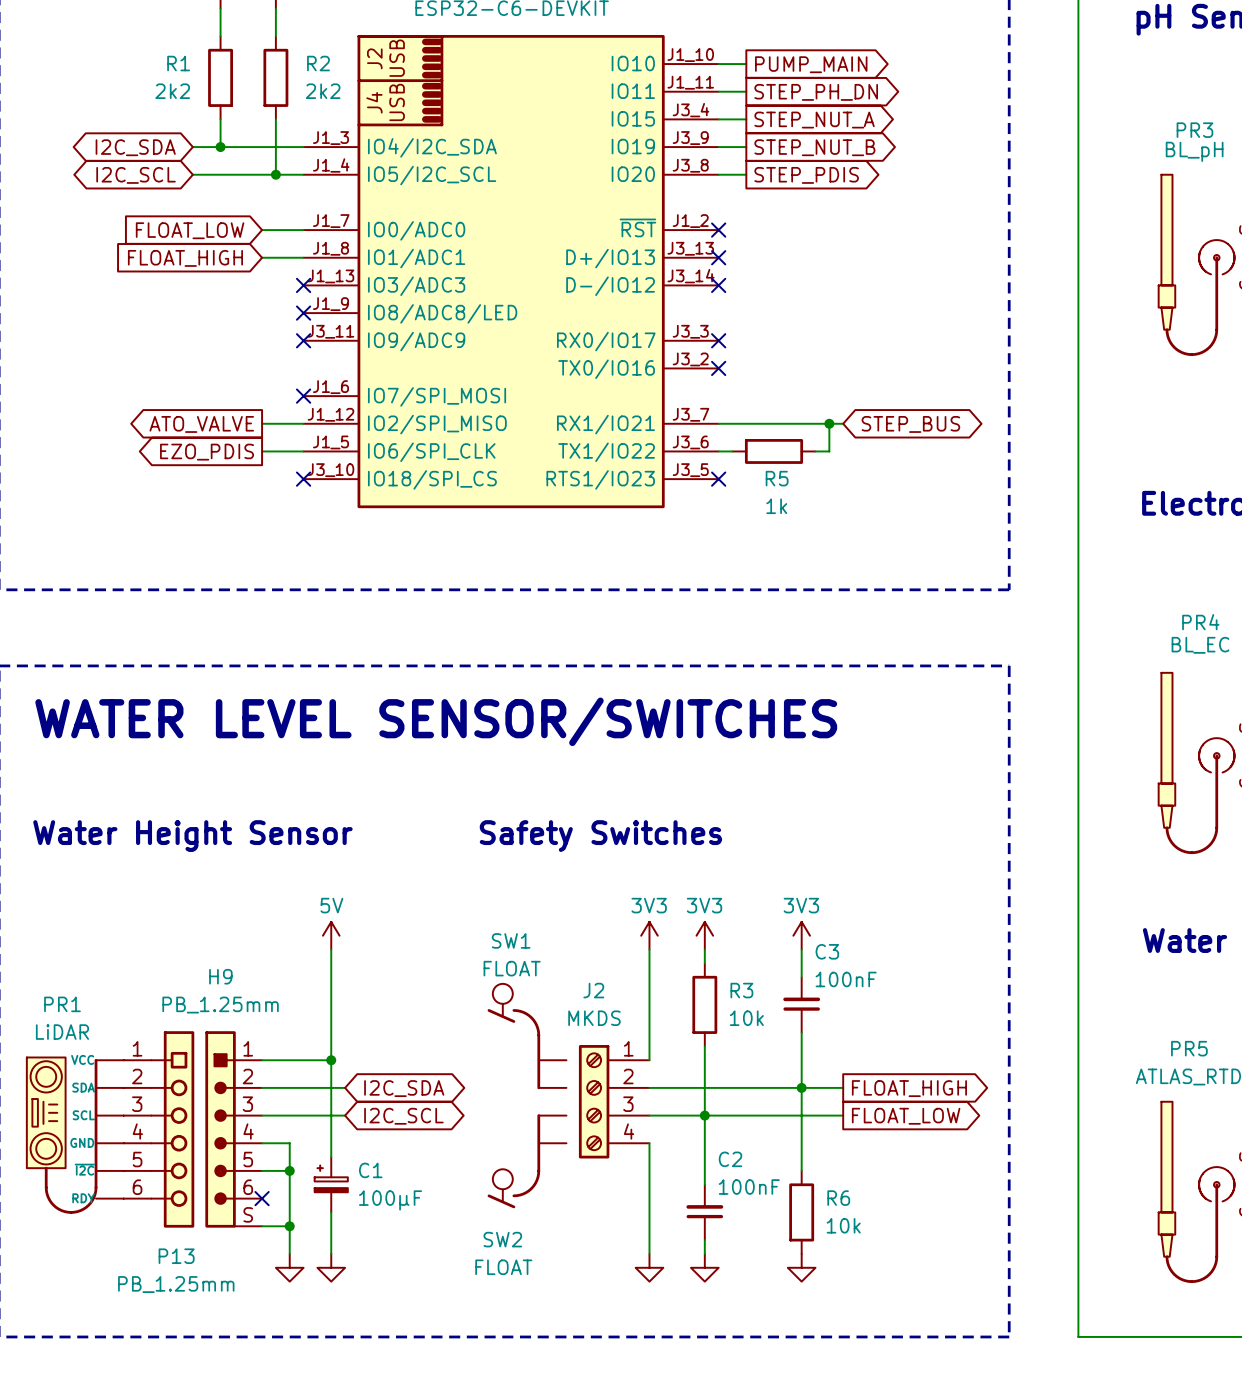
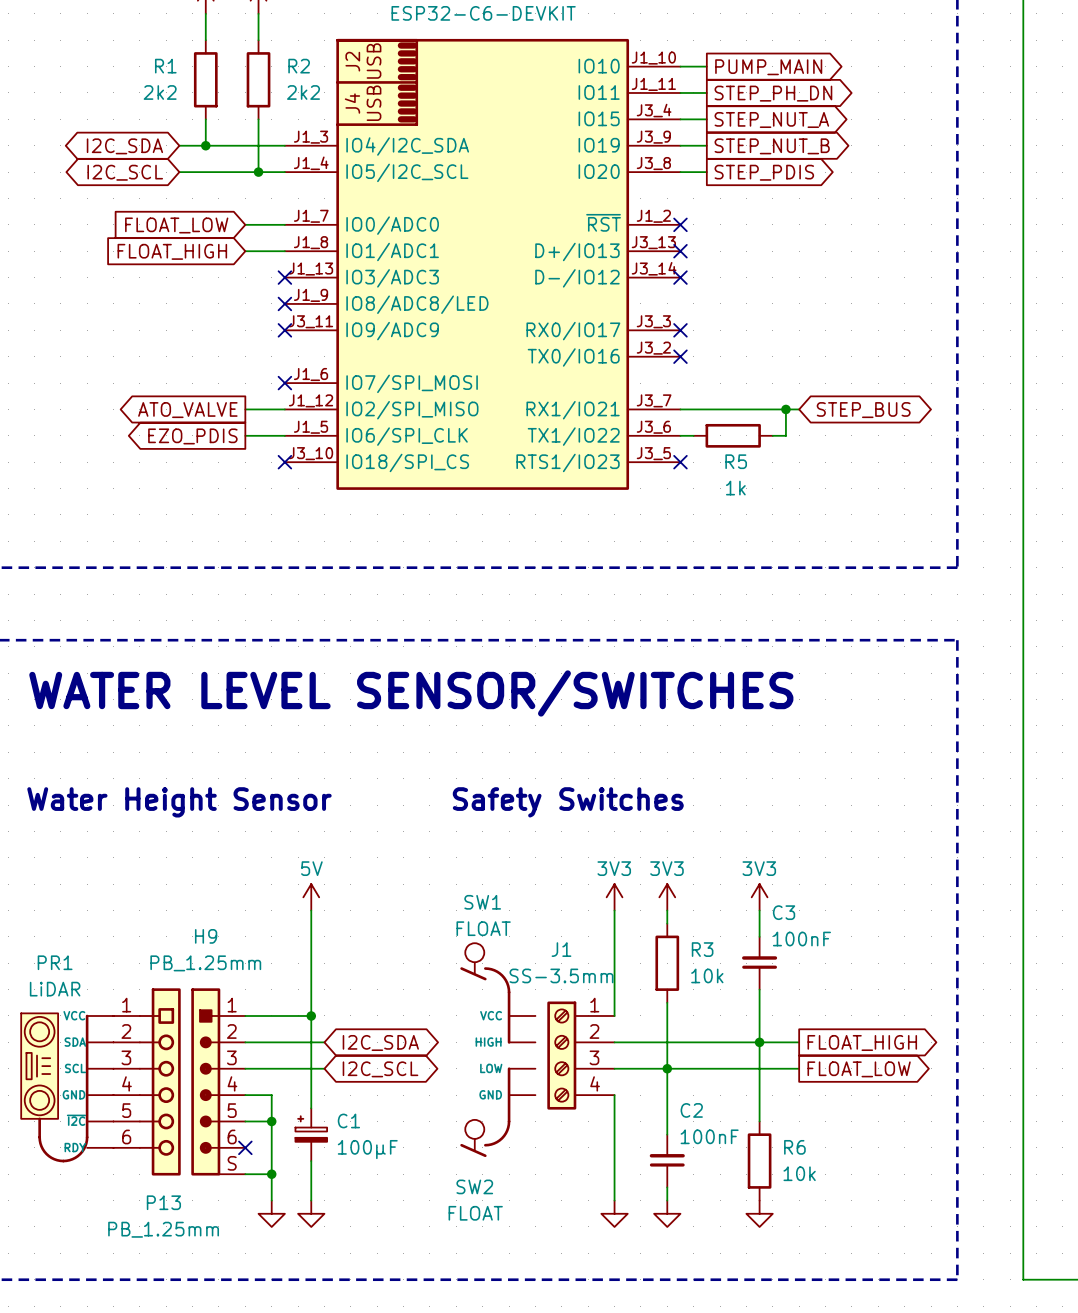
SW1 symbol: [487, 983, 567, 1090] -> [460, 943, 536, 1044]
J2 name: J2 (593, 990) -> J1 (561, 949)
J2 value: MKDS (594, 1018) -> SS-3.5mm (561, 975)
SW2 symbol: [487, 1114, 567, 1209] -> [460, 1067, 536, 1158]

